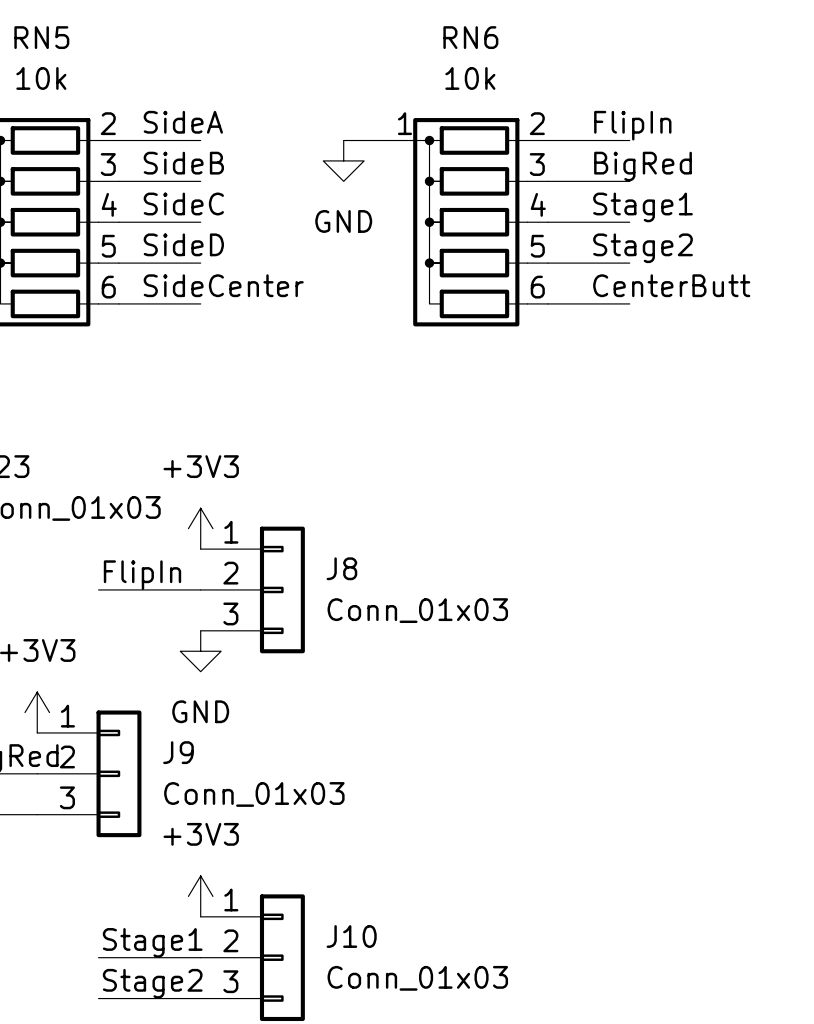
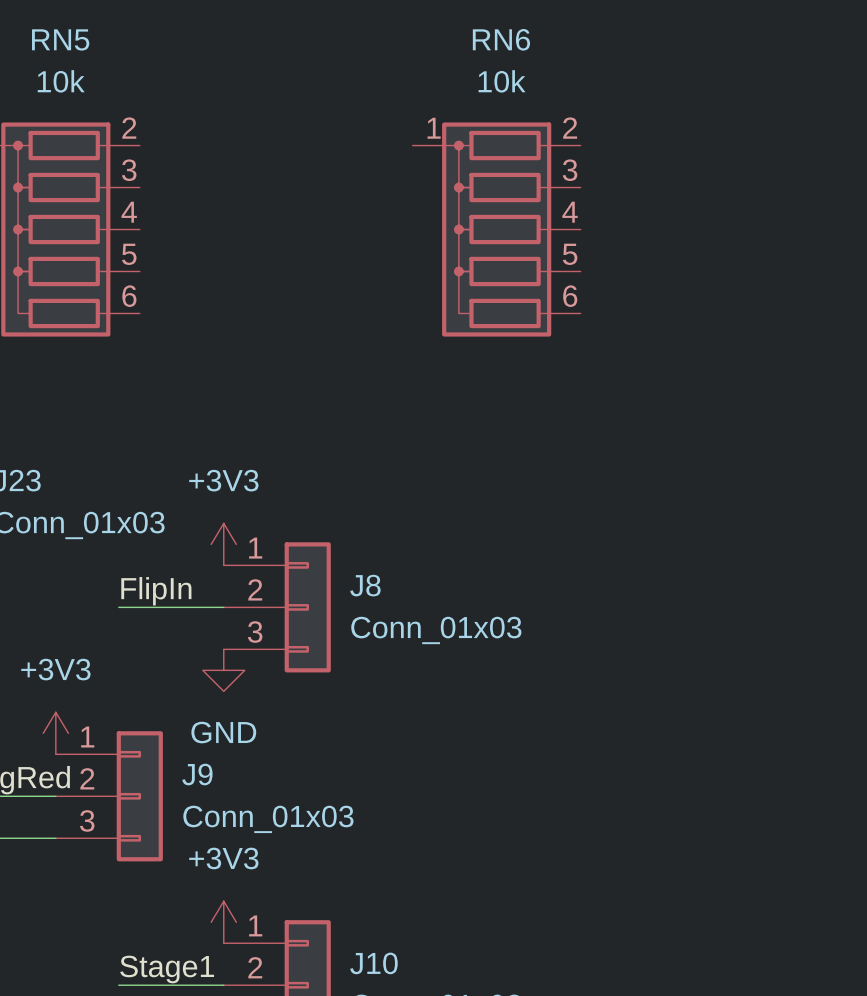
label: SideA (183, 122) -> none
label: FlipIn (632, 125) -> none
wire: (118, 140) (200, 140) -> none
wire: (343, 140) (384, 140) -> none
wire: (548, 140) (629, 140) -> none
power symbol: GND (343, 160) -> none
label: SideB (183, 163) -> none
label: BigRed (643, 166) -> none
wire: (118, 181) (200, 181) -> none
wire: (548, 181) (629, 181) -> none
label: SideC (183, 203) -> none
label: Stage1 (643, 207) -> none
wire: (118, 222) (200, 222) -> none
wire: (548, 222) (629, 222) -> none
label: SideD (183, 244) -> none
label: Stage2 (643, 248) -> none
wire: (118, 263) (200, 263) -> none
wire: (548, 263) (629, 263) -> none
label: SideCenter (223, 285) -> none
label: CenterButt (671, 285) -> none
wire: (118, 303) (200, 303) -> none
wire: (548, 303) (629, 303) -> none

